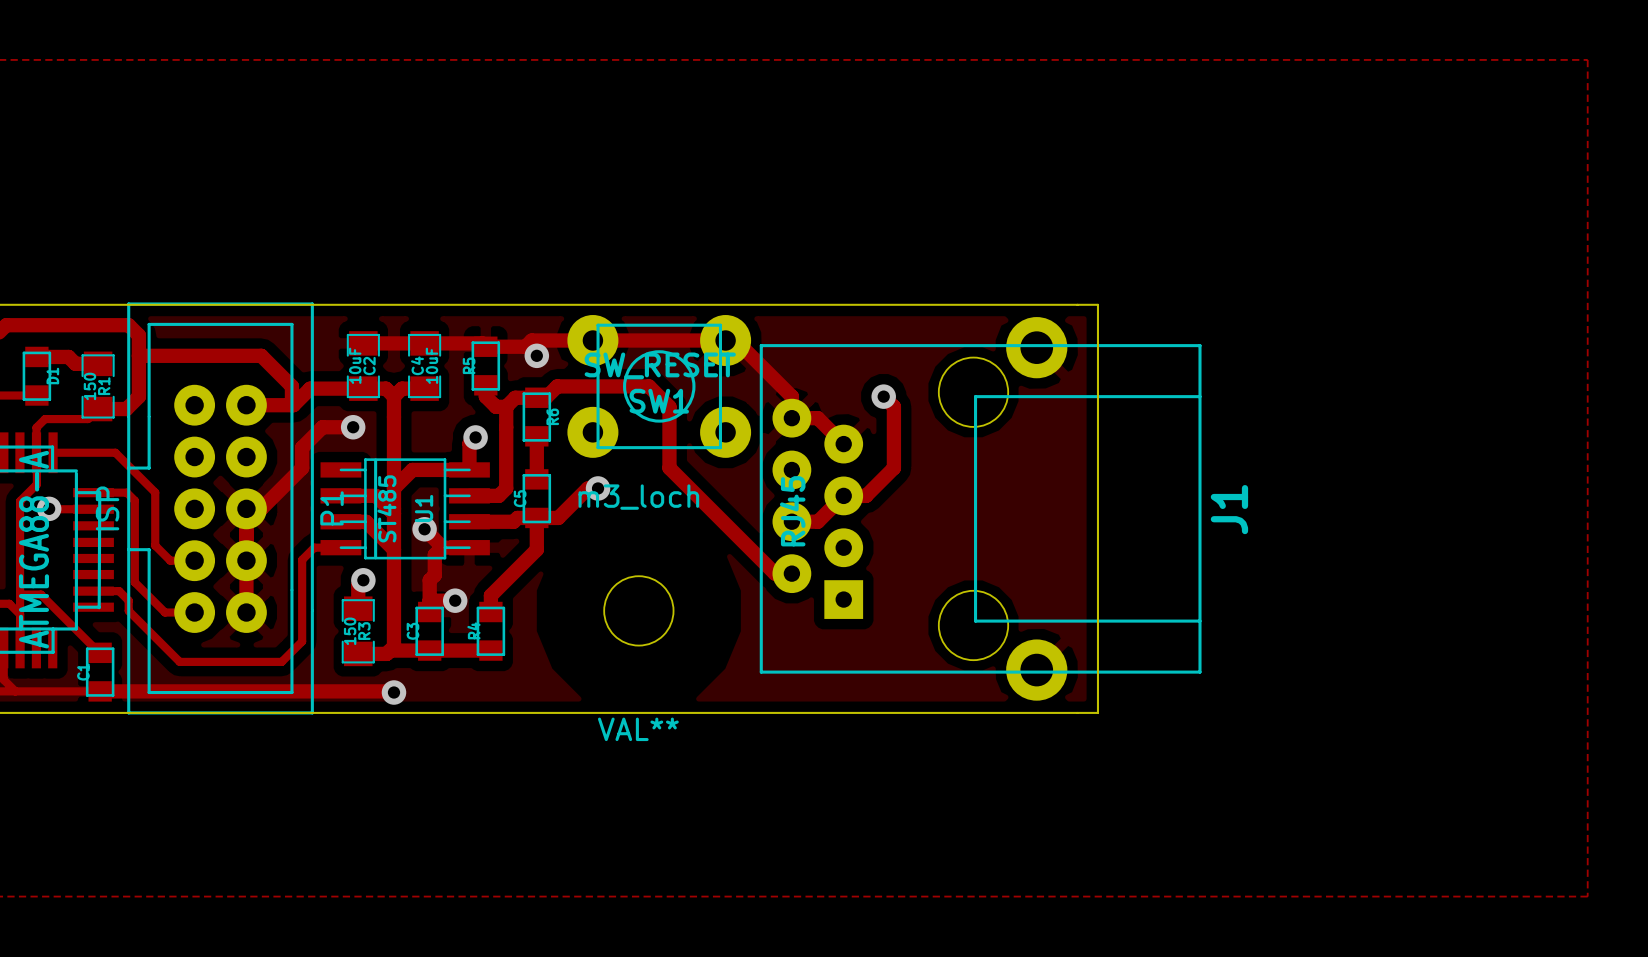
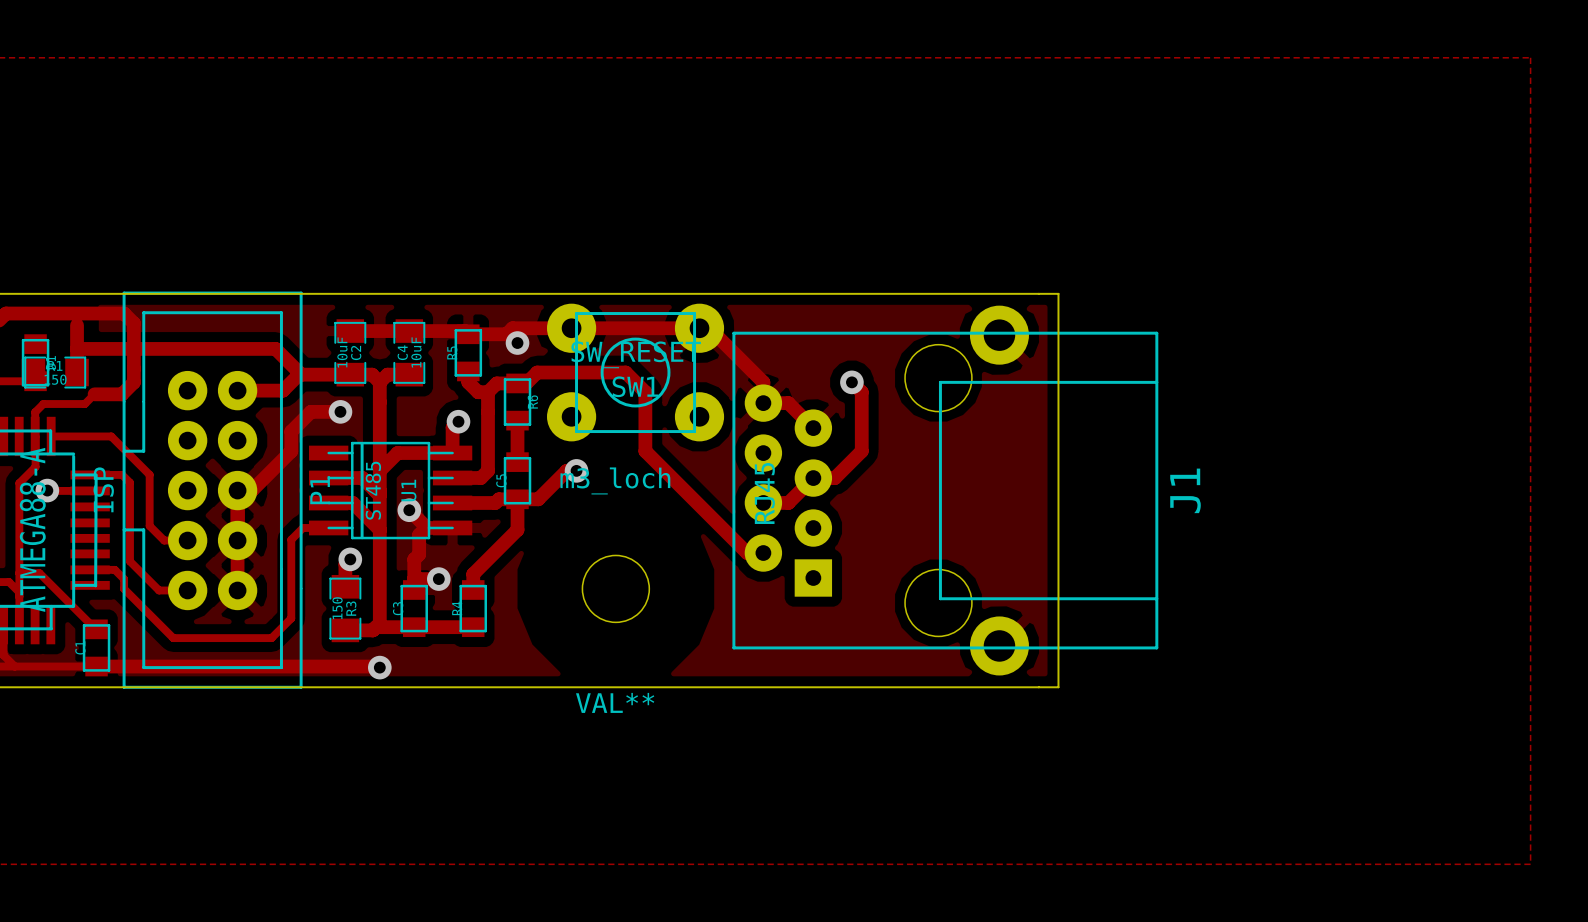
track: none -> (77, 325) (77, 372)
track: (138, 355) (261, 355) (291, 386) (291, 405) -> none
track: (36, 356) (68, 356) (75, 363) (98, 363) -> none
track: none -> (77, 348) (275, 348) (301, 374)
R1 rotation: 0° (98, 386) -> 90° clockwise (55, 372)

